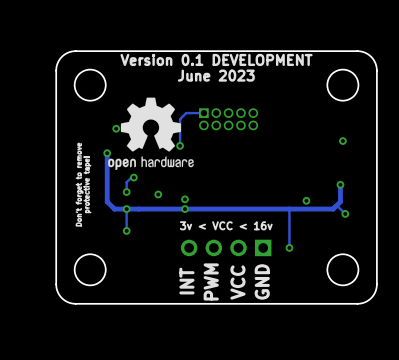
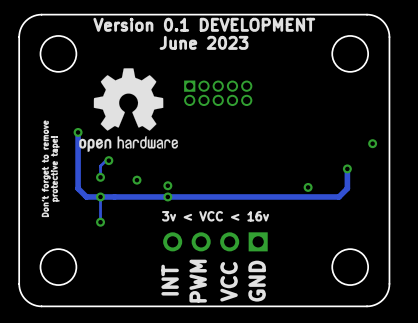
track: (203, 113) (186, 113) (180, 119) (180, 145) -> none
via: (116, 128) -> none
via: (342, 141) -> none
via: (180, 145) -> none
via: none -> (372, 143)
track: (335, 206) (345, 213) -> none
track: (289, 209) (289, 247) -> none
via: (345, 213) -> none
via: (289, 247) -> none

